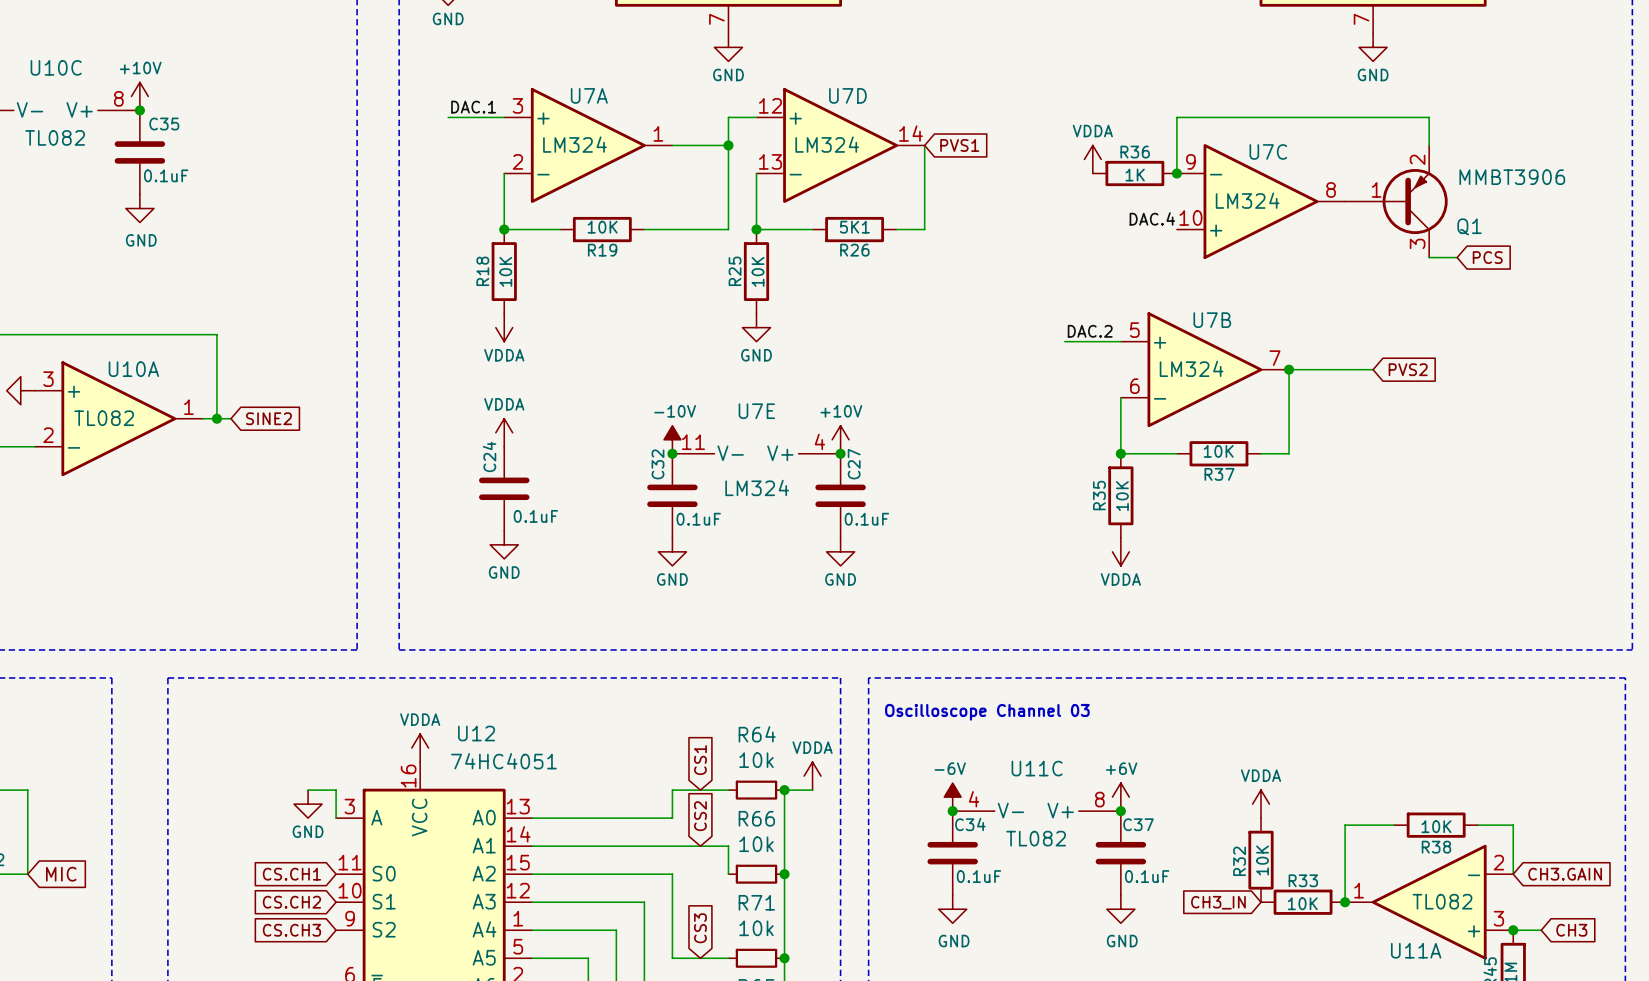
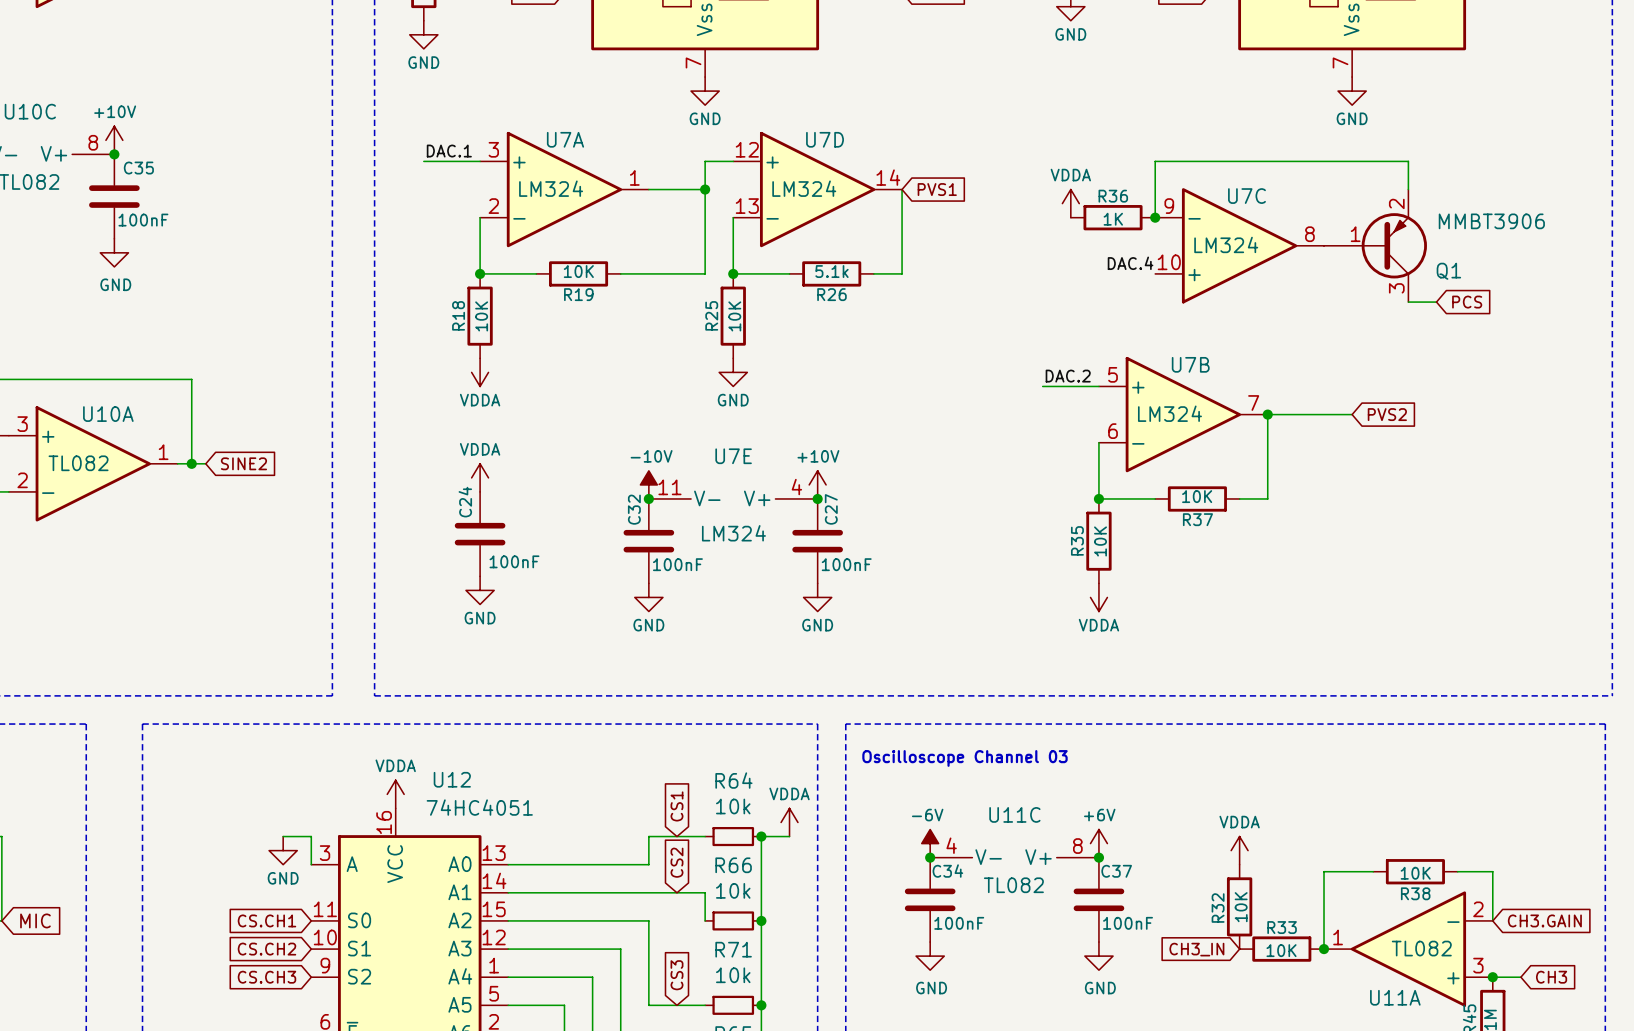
C35 value: 0.1uF (166, 175) -> 100nF (143, 220)
R26 value: 5K1 (854, 227) -> 5.1k (831, 271)
C24 value: 0.1uF (535, 516) -> 100nF (514, 561)
C32 value: 0.1uF (698, 519) -> 100nF (677, 564)
C27 value: 0.1uF (866, 519) -> 100nF (846, 564)
C34 value: 0.1uF (978, 876) -> 100nF (959, 923)
C37 value: 0.1uF (1147, 876) -> 100nF (1128, 923)

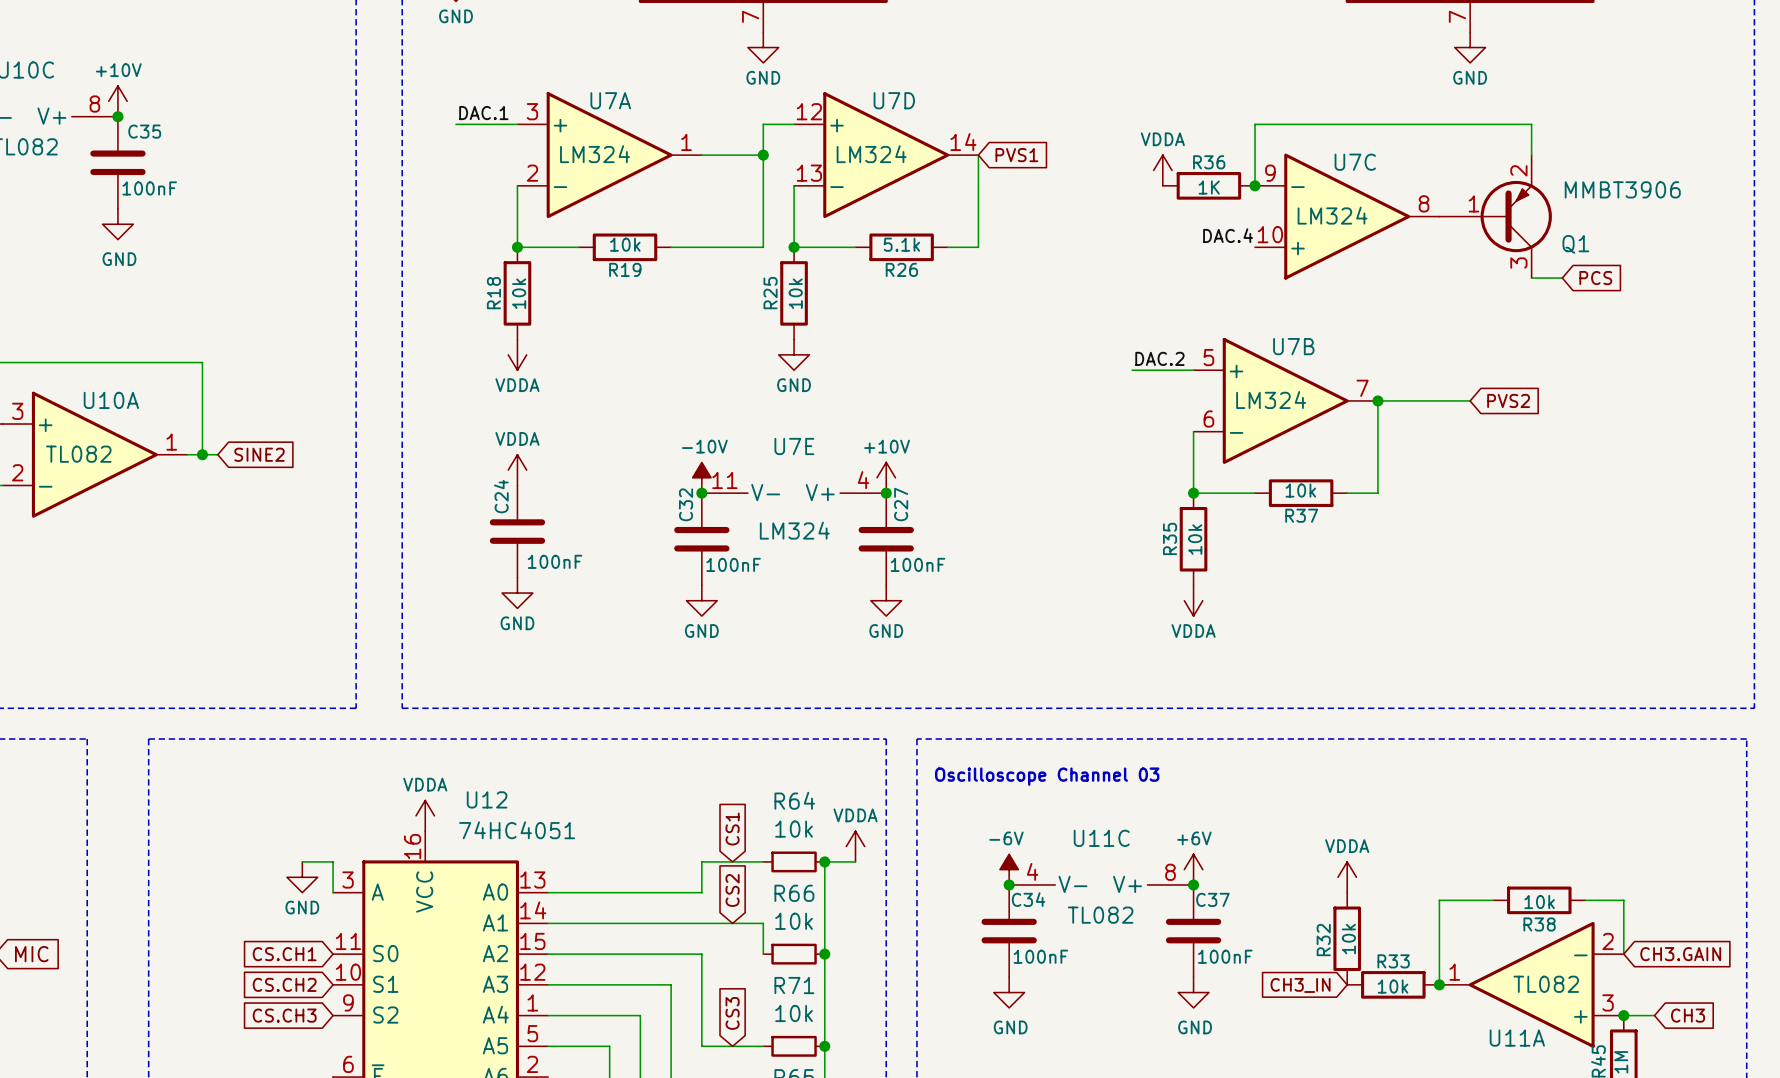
R19 value: 10K (578, 271) -> 10k (625, 244)
R18 value: 10K (481, 316) -> 10k (519, 293)
R25 value: 10K (734, 316) -> 10k (795, 293)
R37 value: 10K (1197, 496) -> 10k (1300, 490)
R35 value: 10K (1100, 541) -> 10k (1195, 539)
R38 value: 10K (1415, 873) -> 10k (1539, 902)
R32 value: 10K (1241, 907) -> 10k (1348, 939)
R33 value: 10K (1281, 950) -> 10k (1393, 986)

